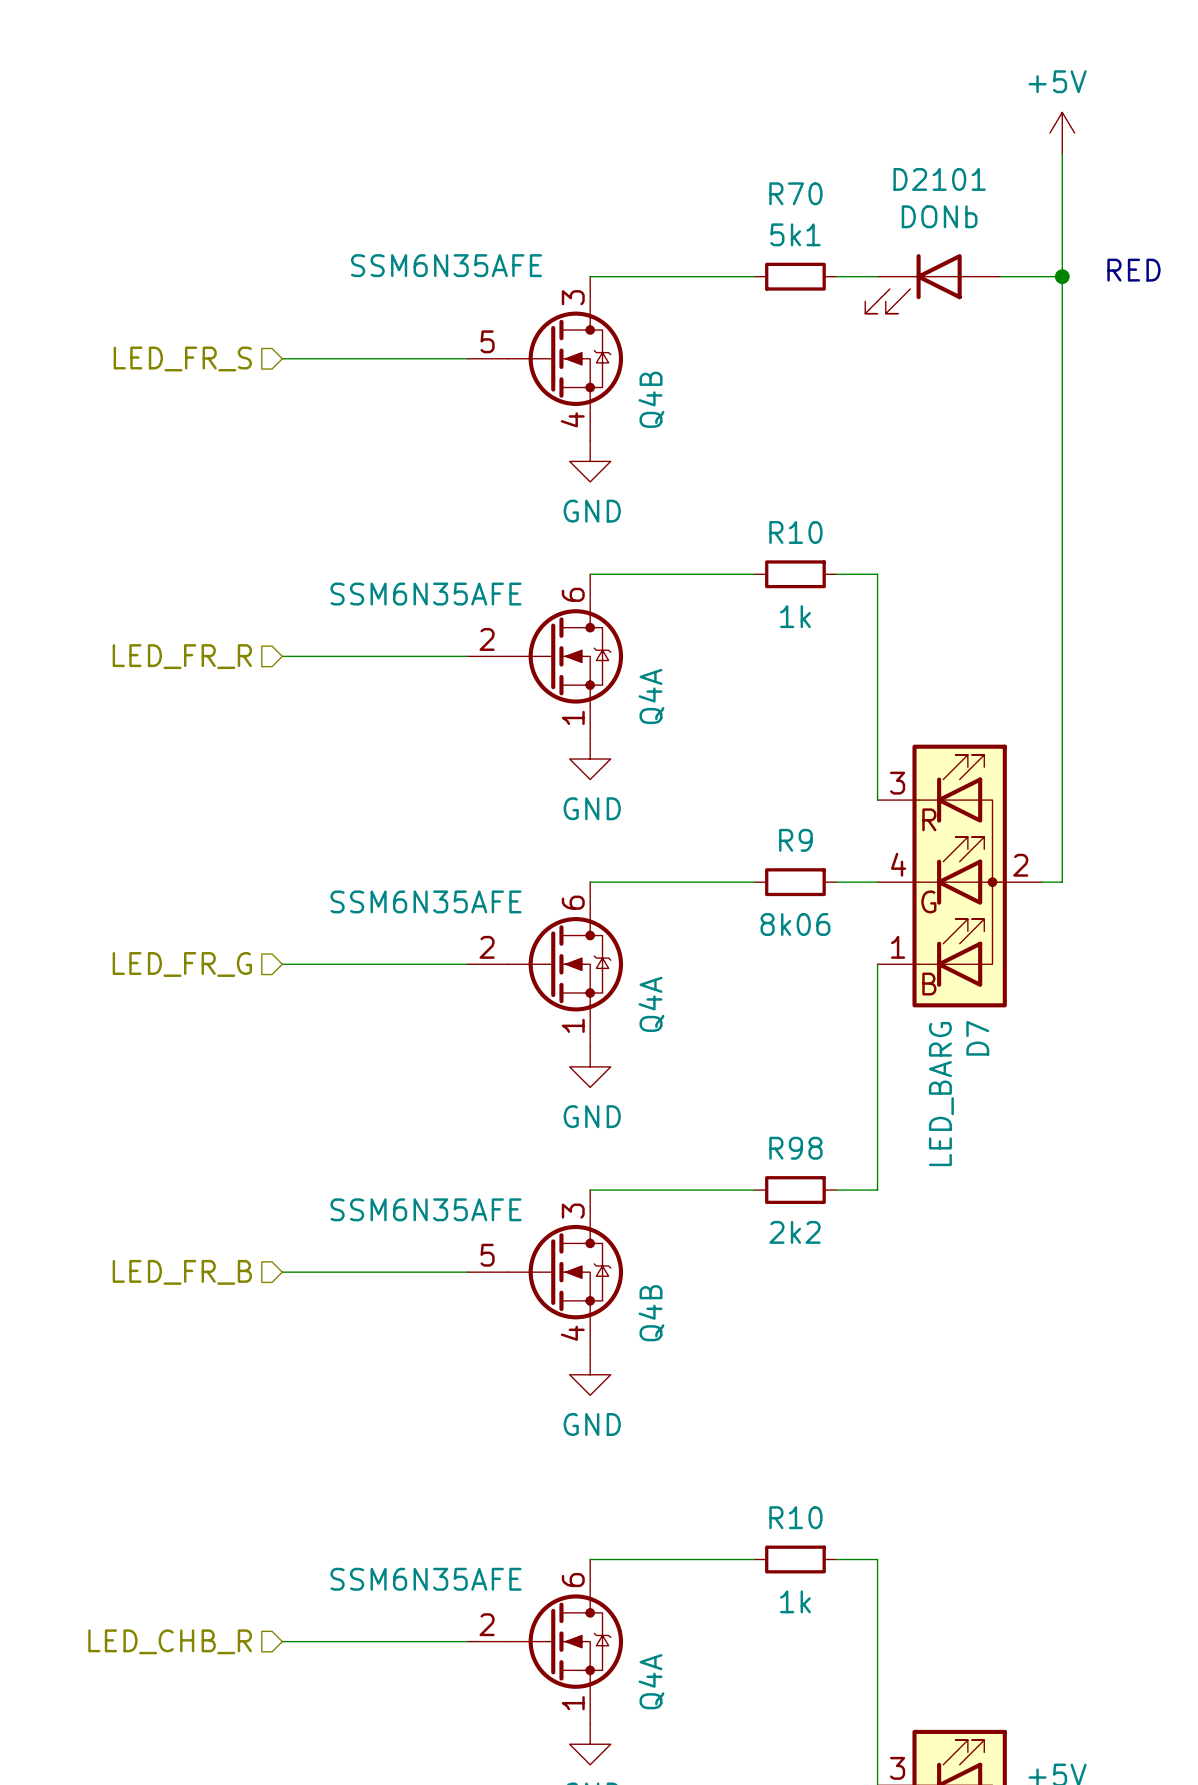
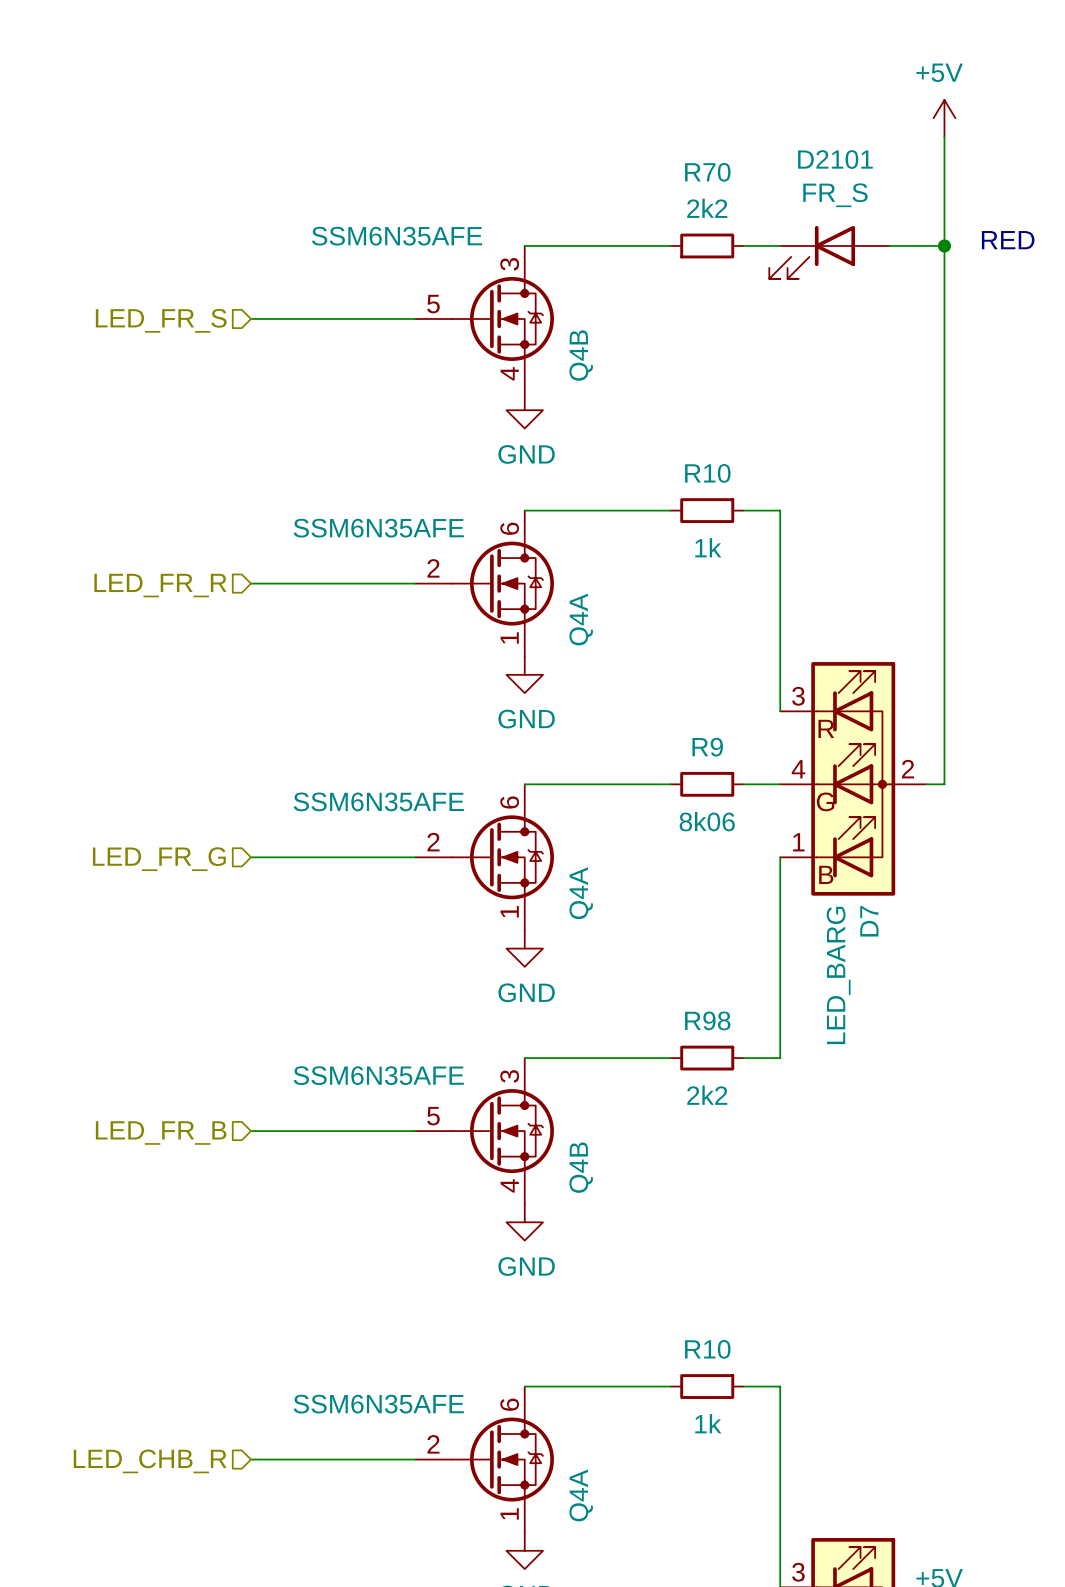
D2101 value: DONb (939, 216) -> FR_S (835, 195)
R70 value: 5k1 (795, 234) -> 2k2 (707, 208)

